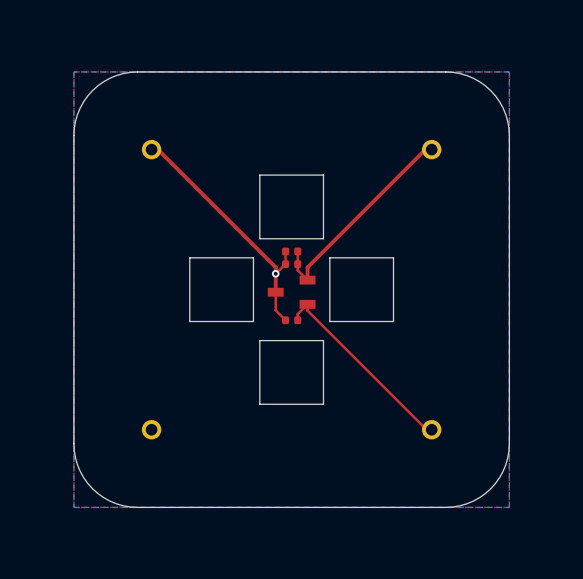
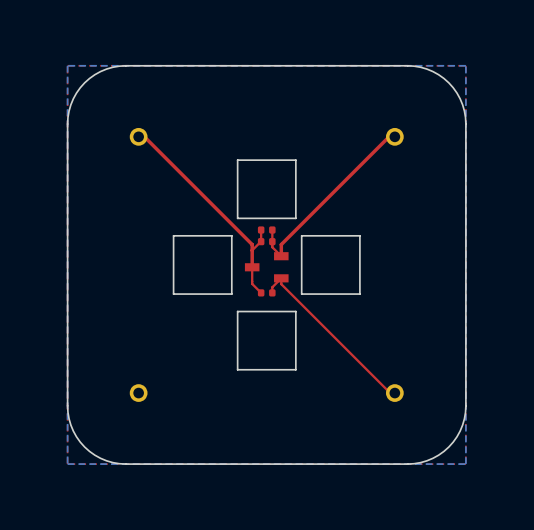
via: (275, 273) -> none

